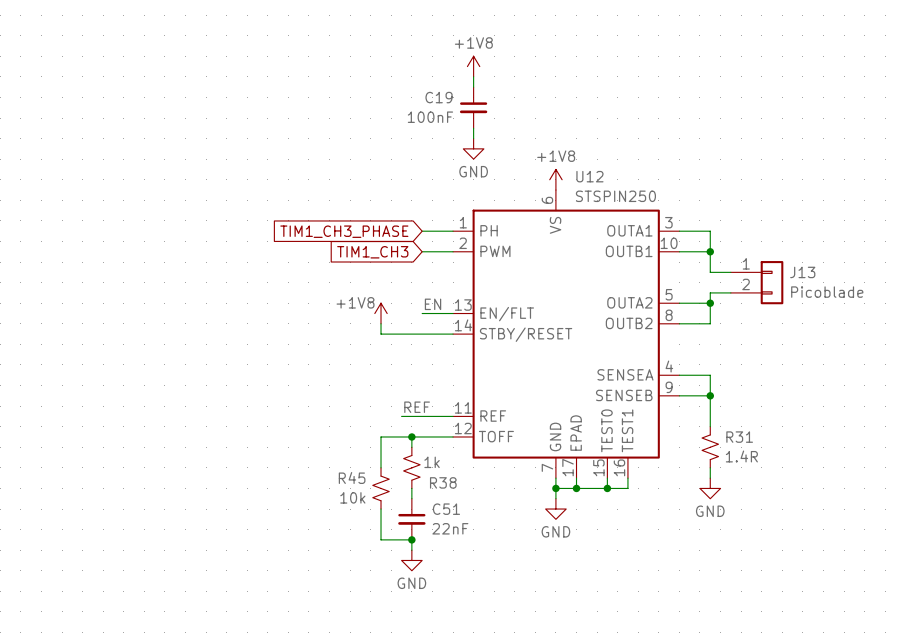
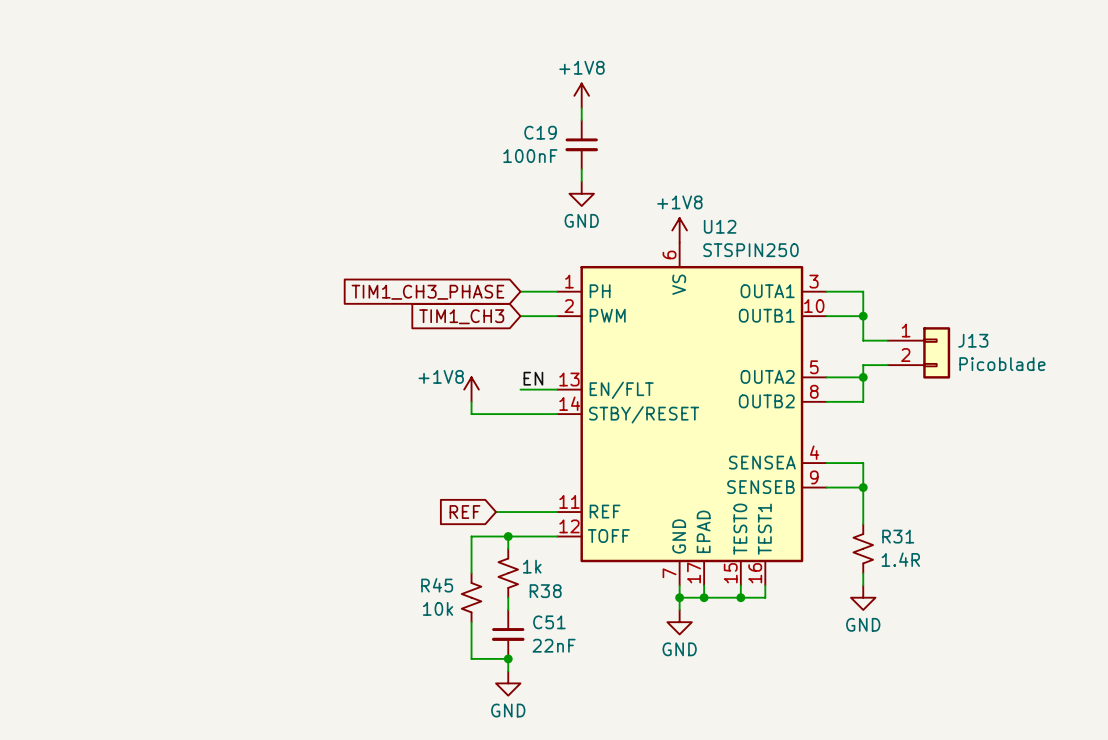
label: REF (417, 407) -> none
global label: none -> REF (464, 512)

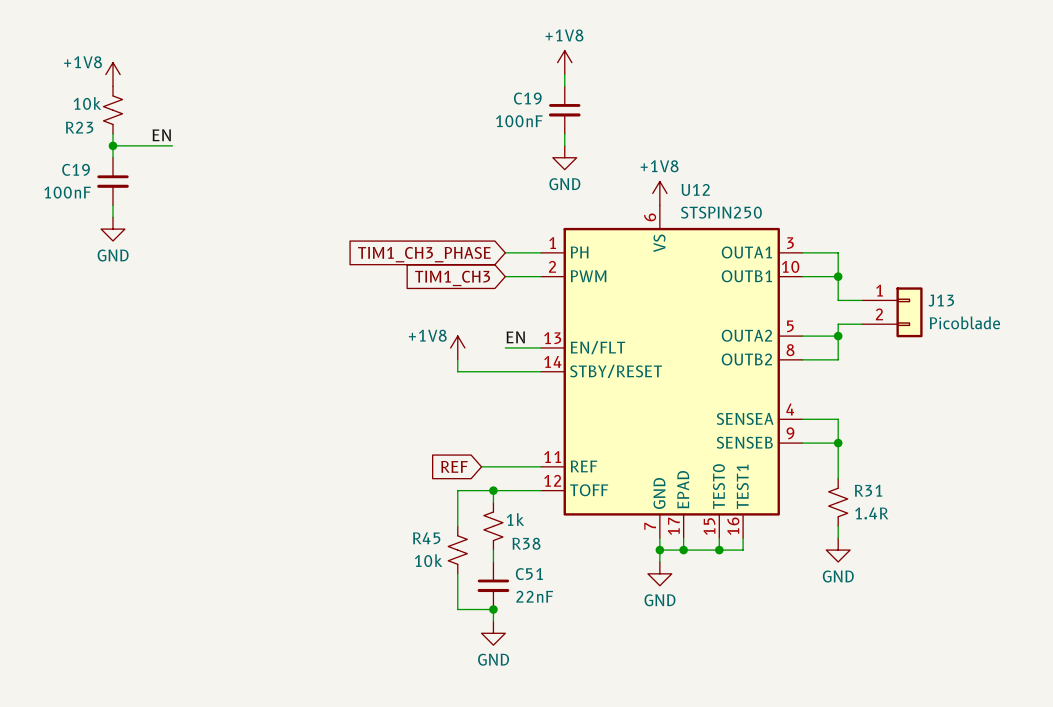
power symbol: none -> +1V8 (113, 74)
R23: none -> 10k (113, 110)
wire: none -> (113, 133) (113, 157)
label: none -> EN (161, 135)
wire: none -> (113, 145) (172, 145)
junction: none -> (113, 145)
C19: none -> 100nF (113, 181)
wire: none -> (113, 205) (113, 217)
power symbol: none -> GND (113, 229)

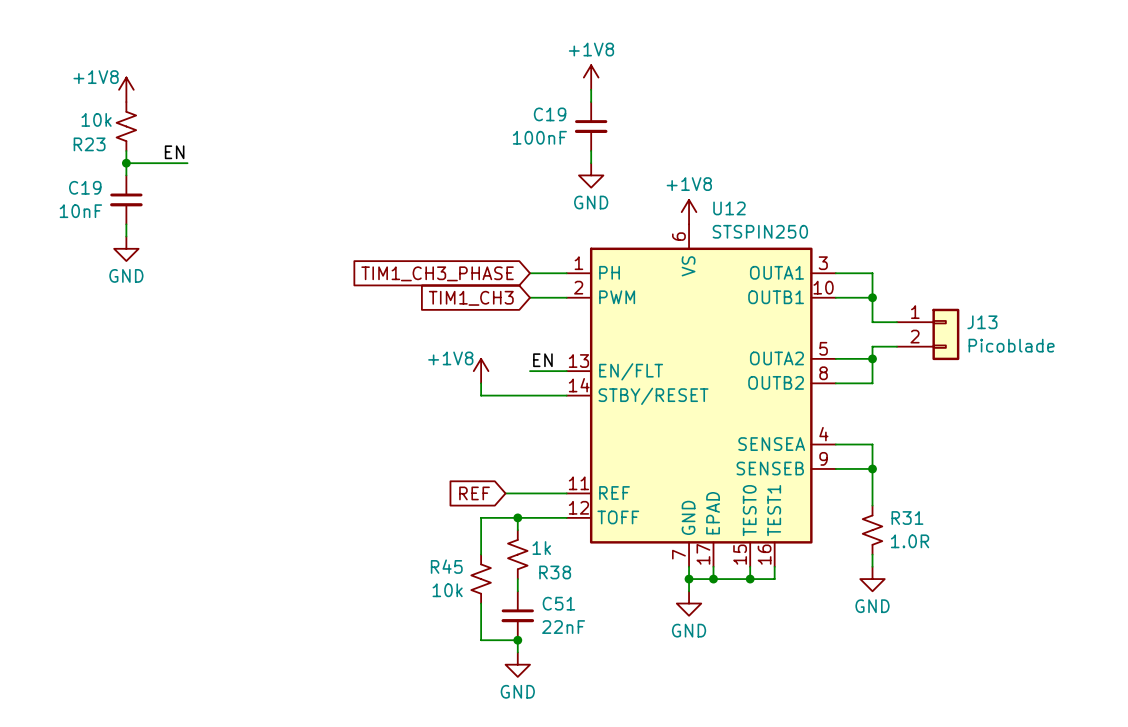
C19 value: 100nF (67, 192) -> 10nF (80, 211)
R31 value: 1.4R (871, 513) -> 1.0R (910, 541)

